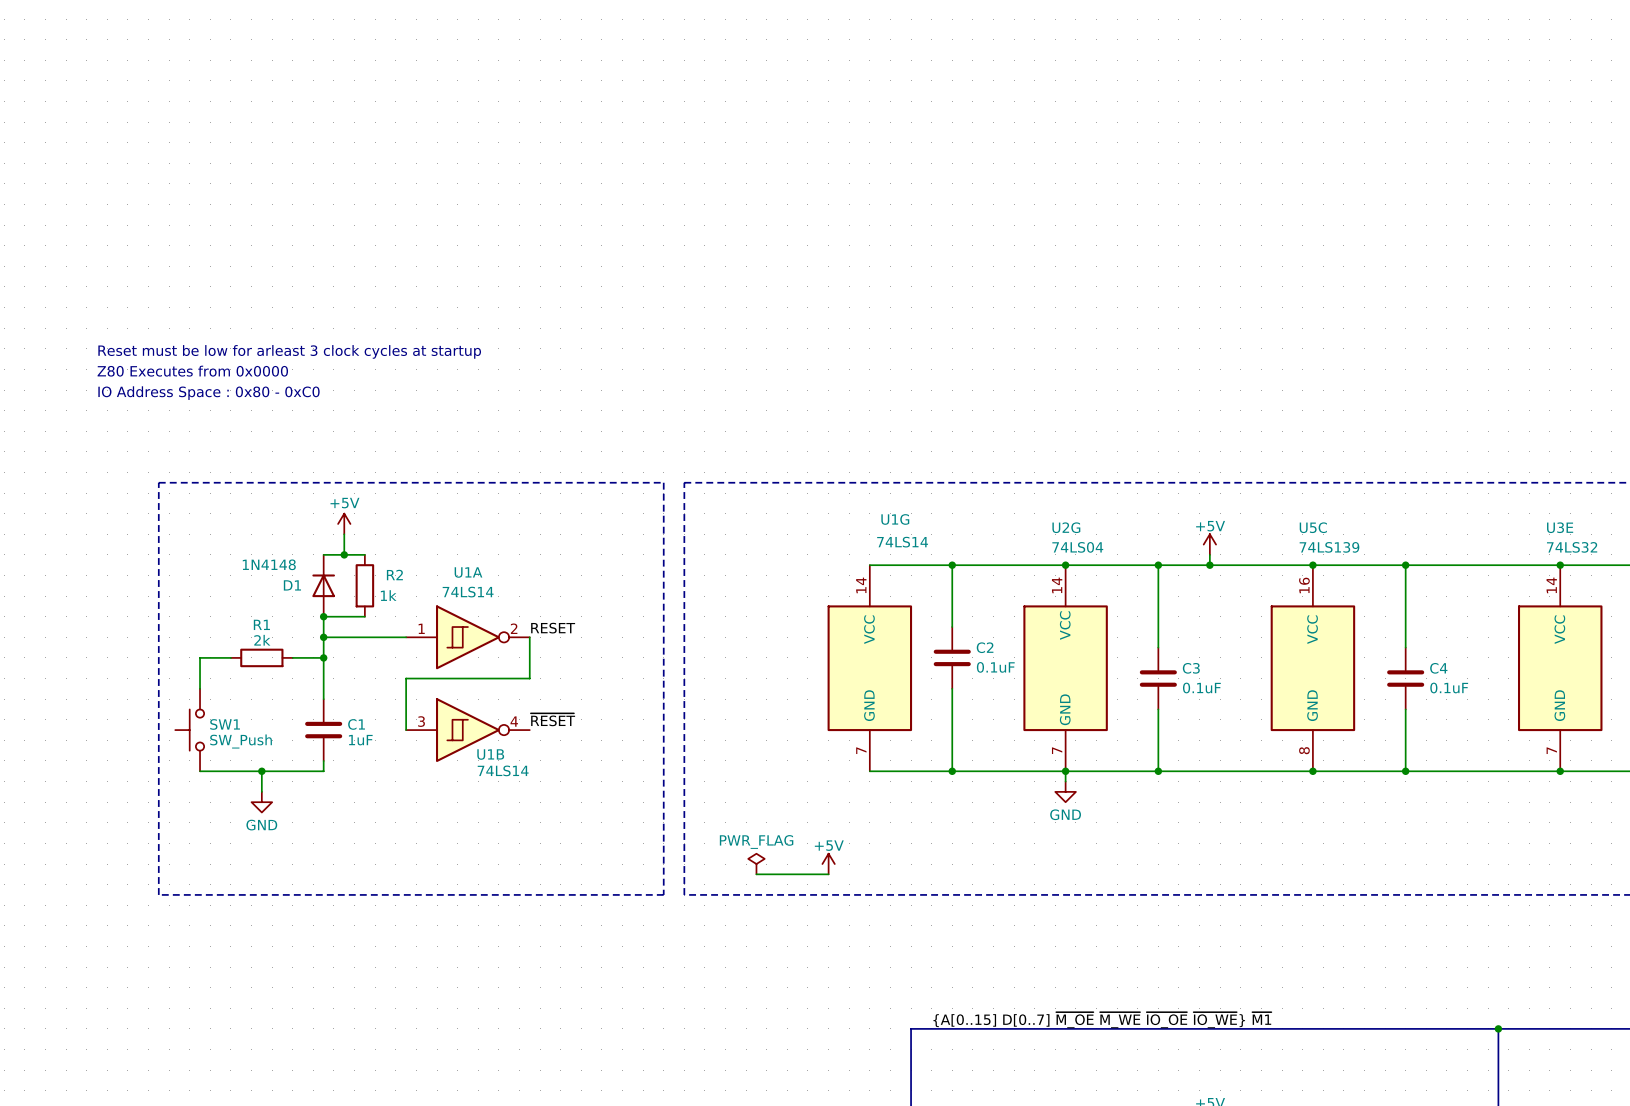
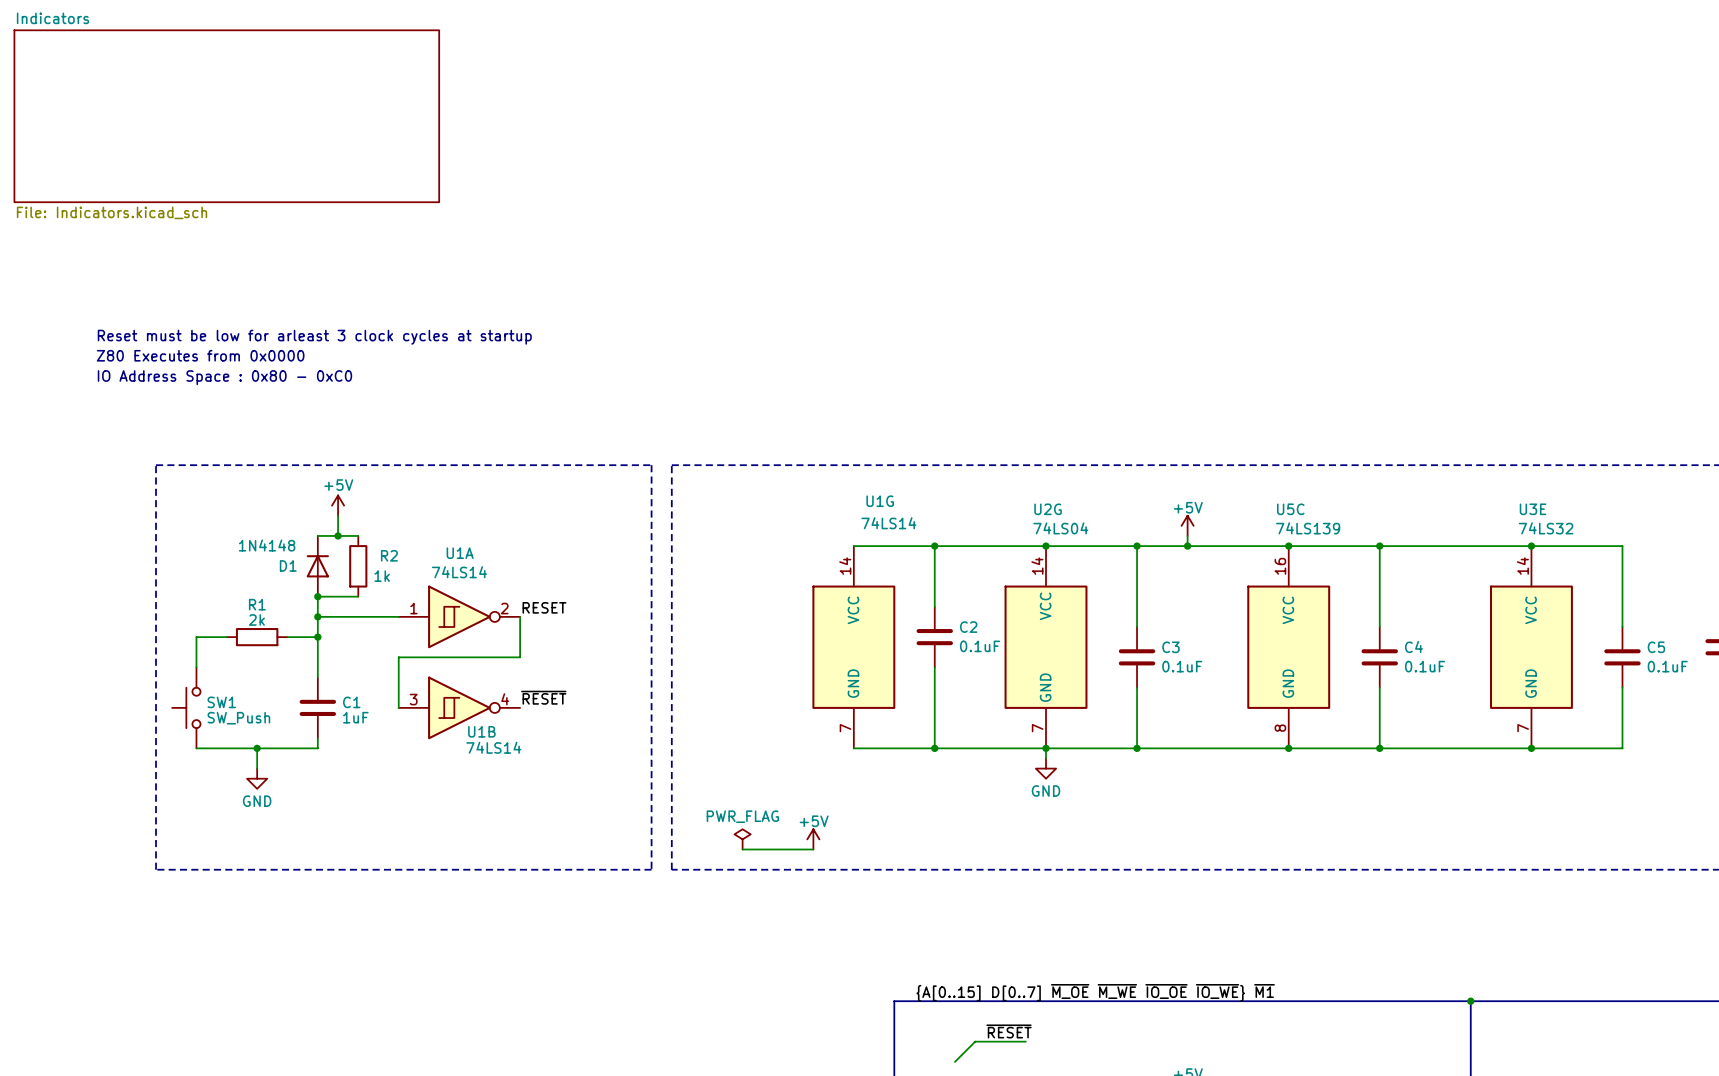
sheet Indicators: none -> File: Indicators.kicad_sch (226, 116)
label: none -> ~{RESET} (1009, 1031)
wire: none -> (1025, 1041) (975, 1041) (954, 1061)

